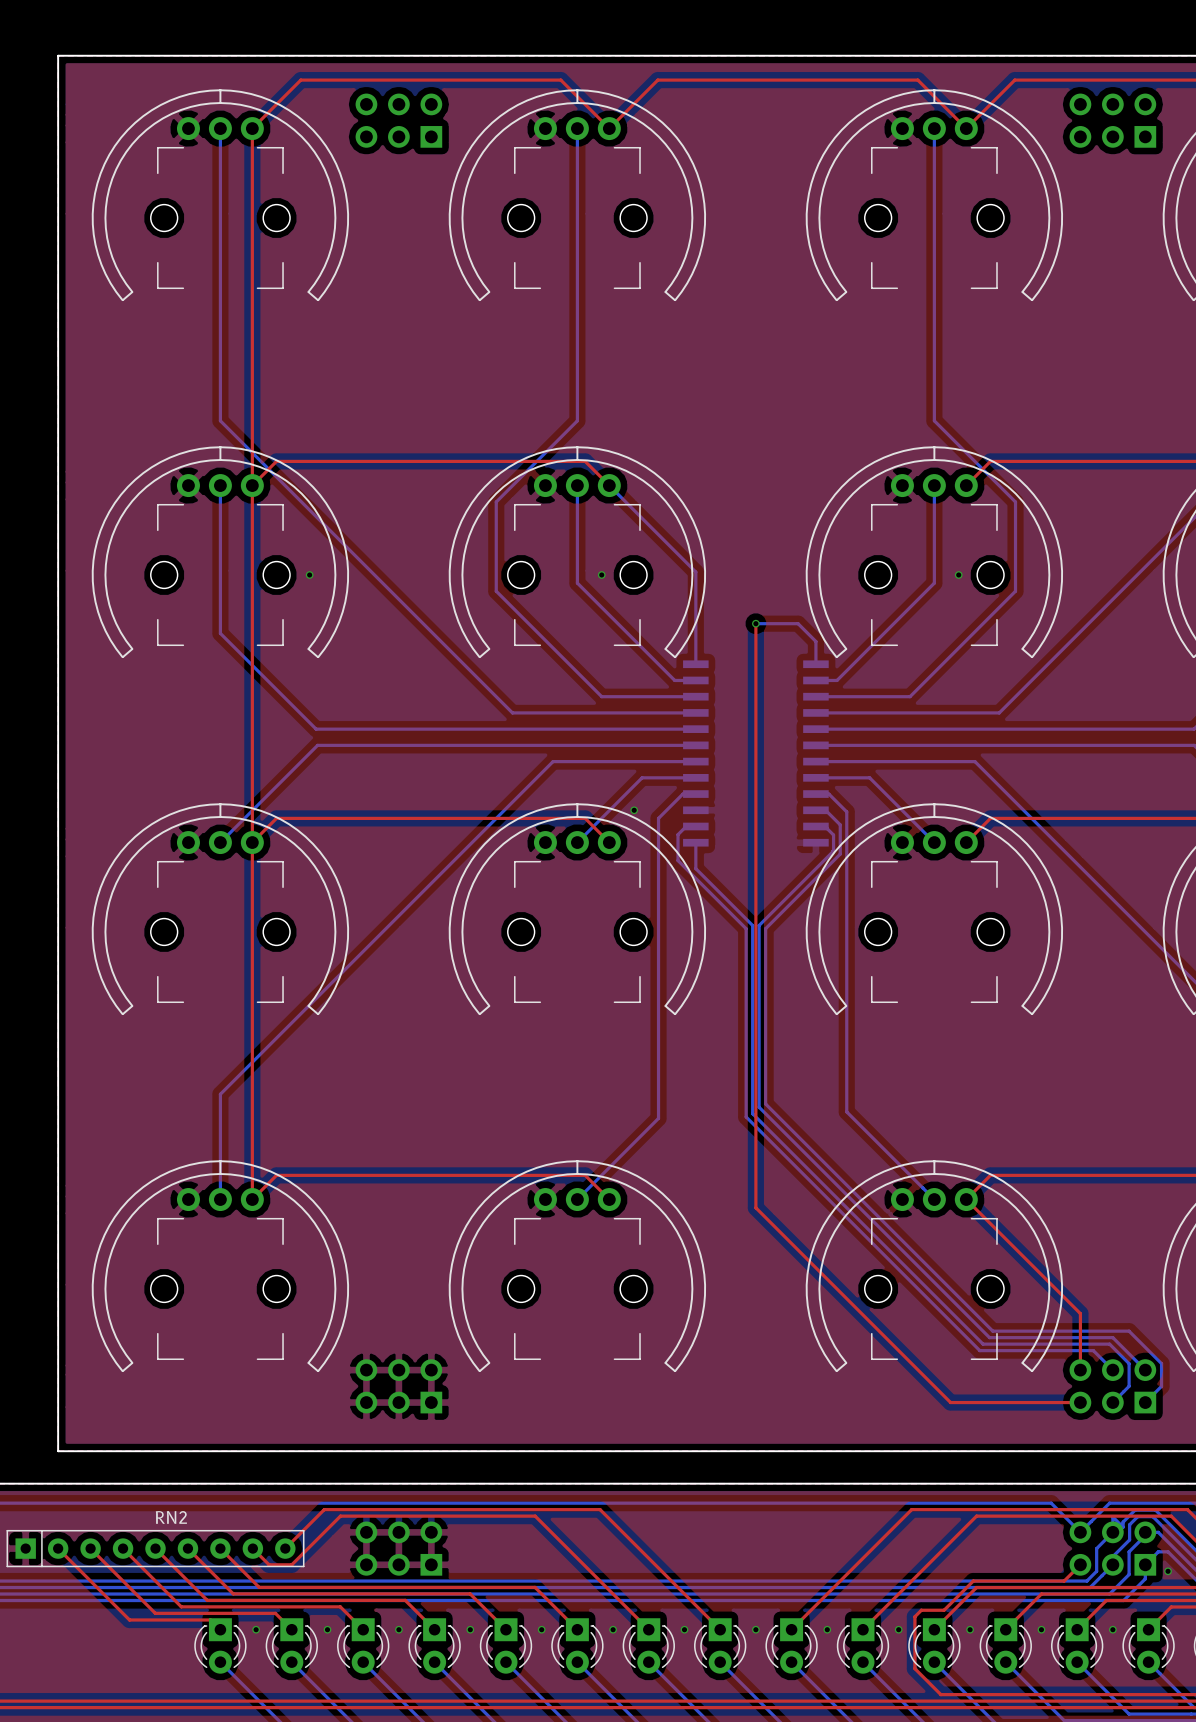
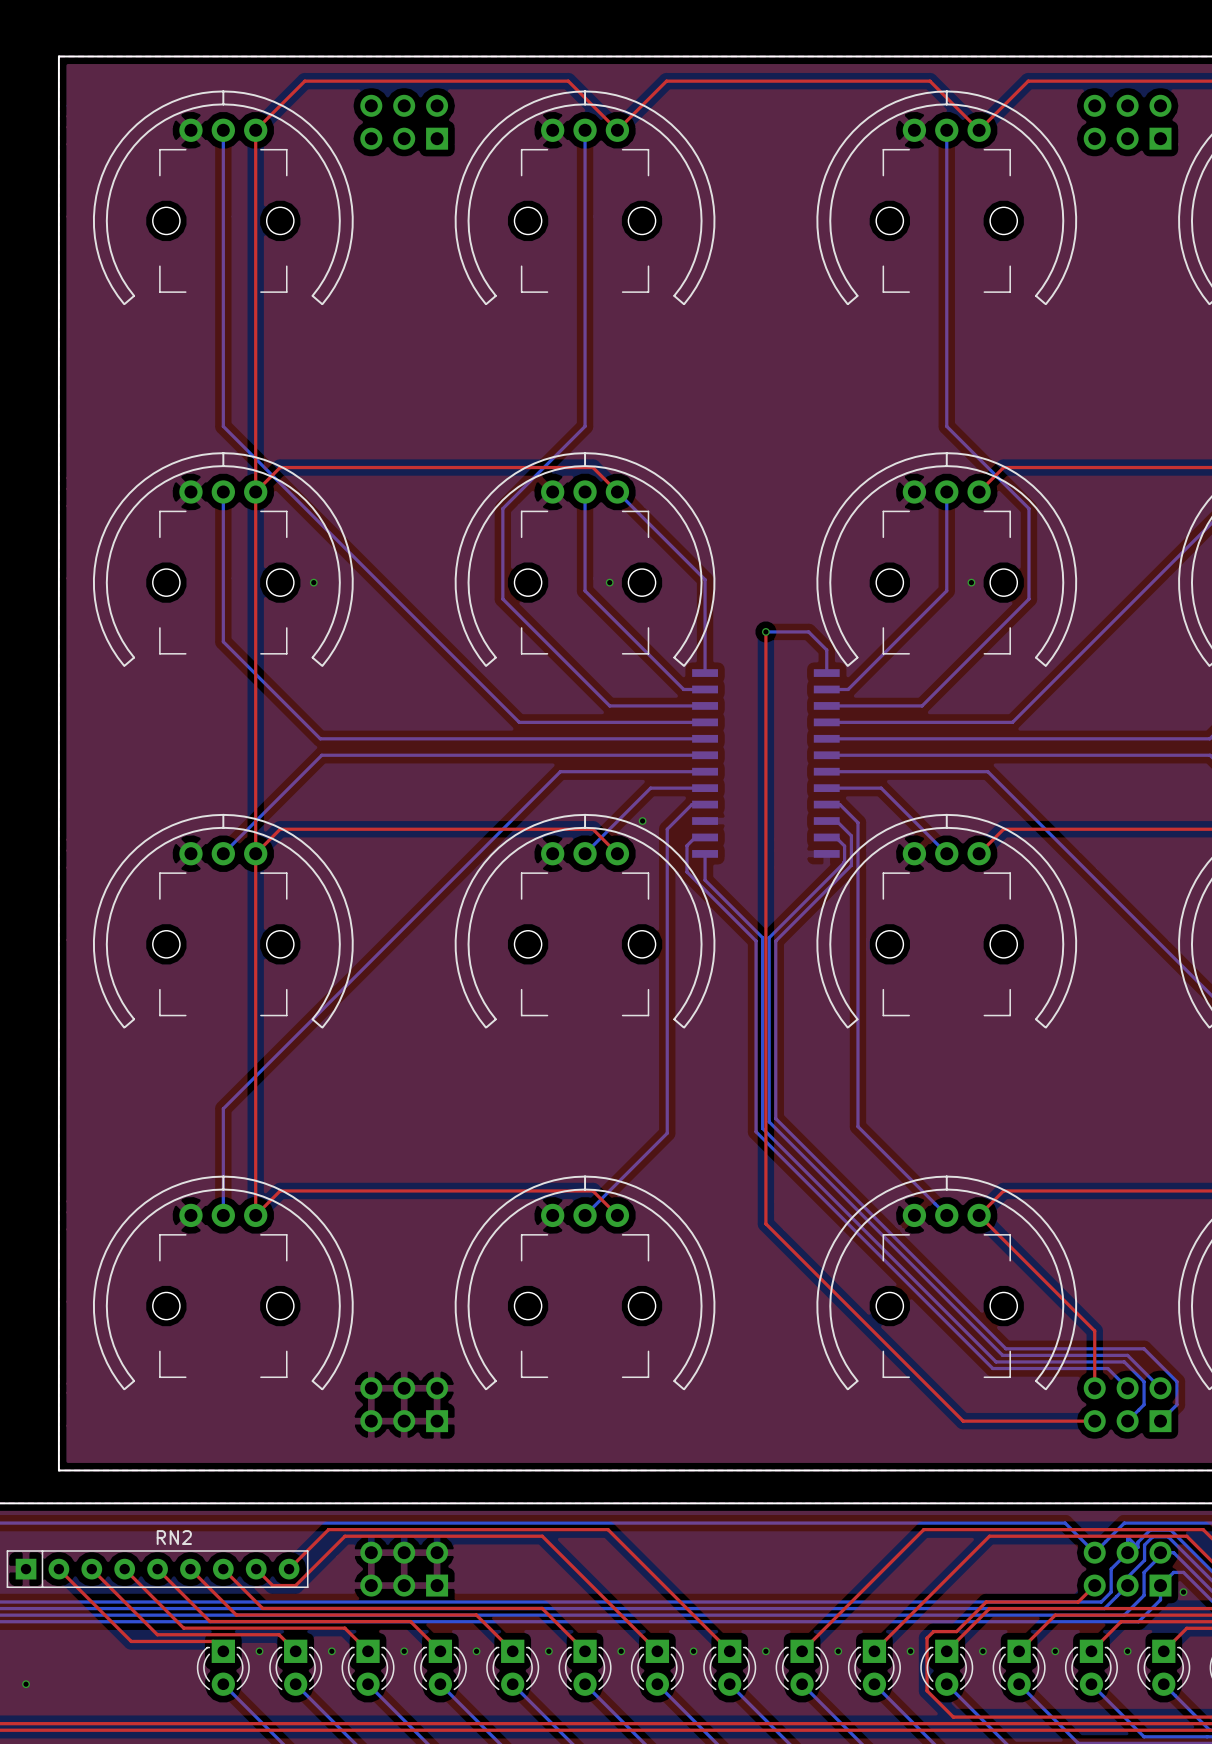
via: none -> (26, 1684)

